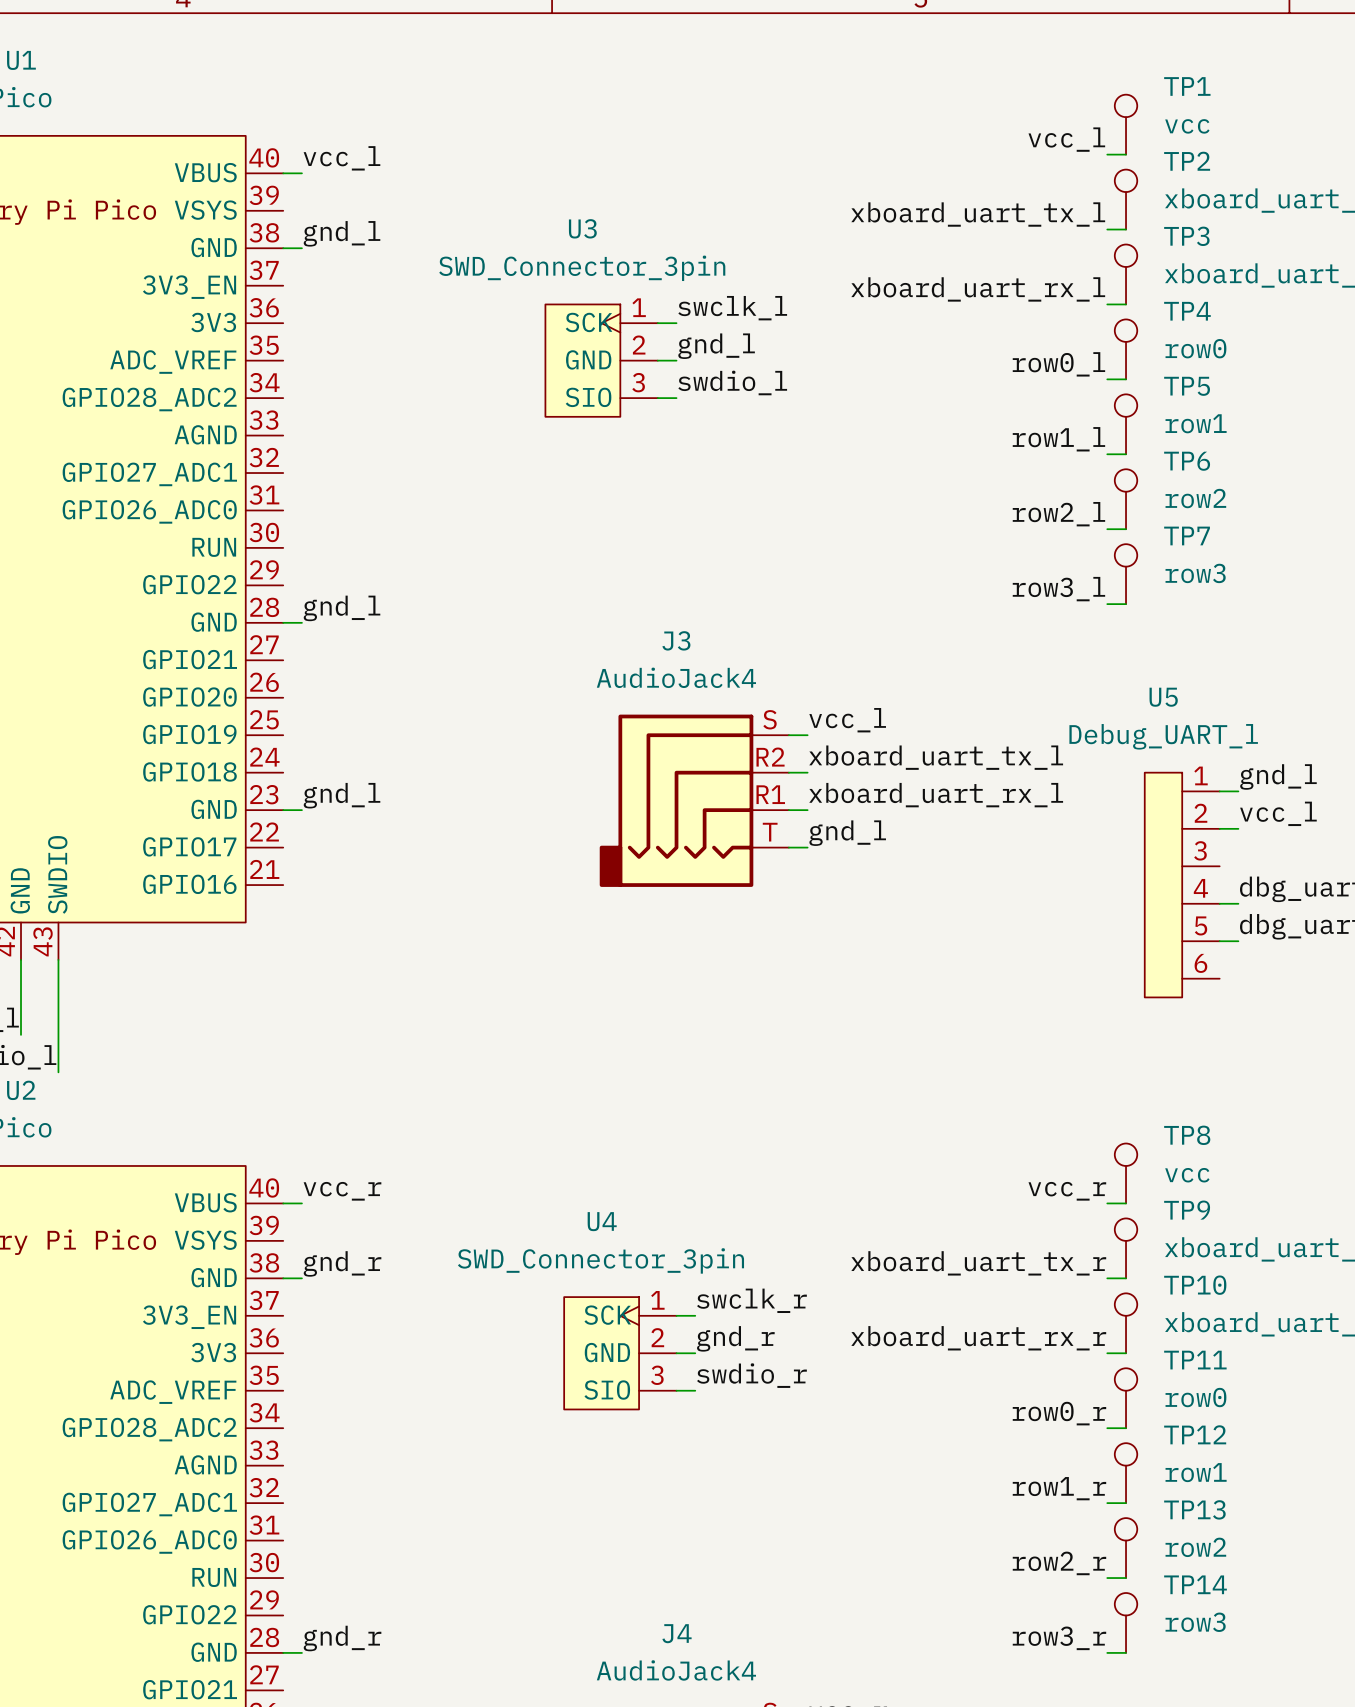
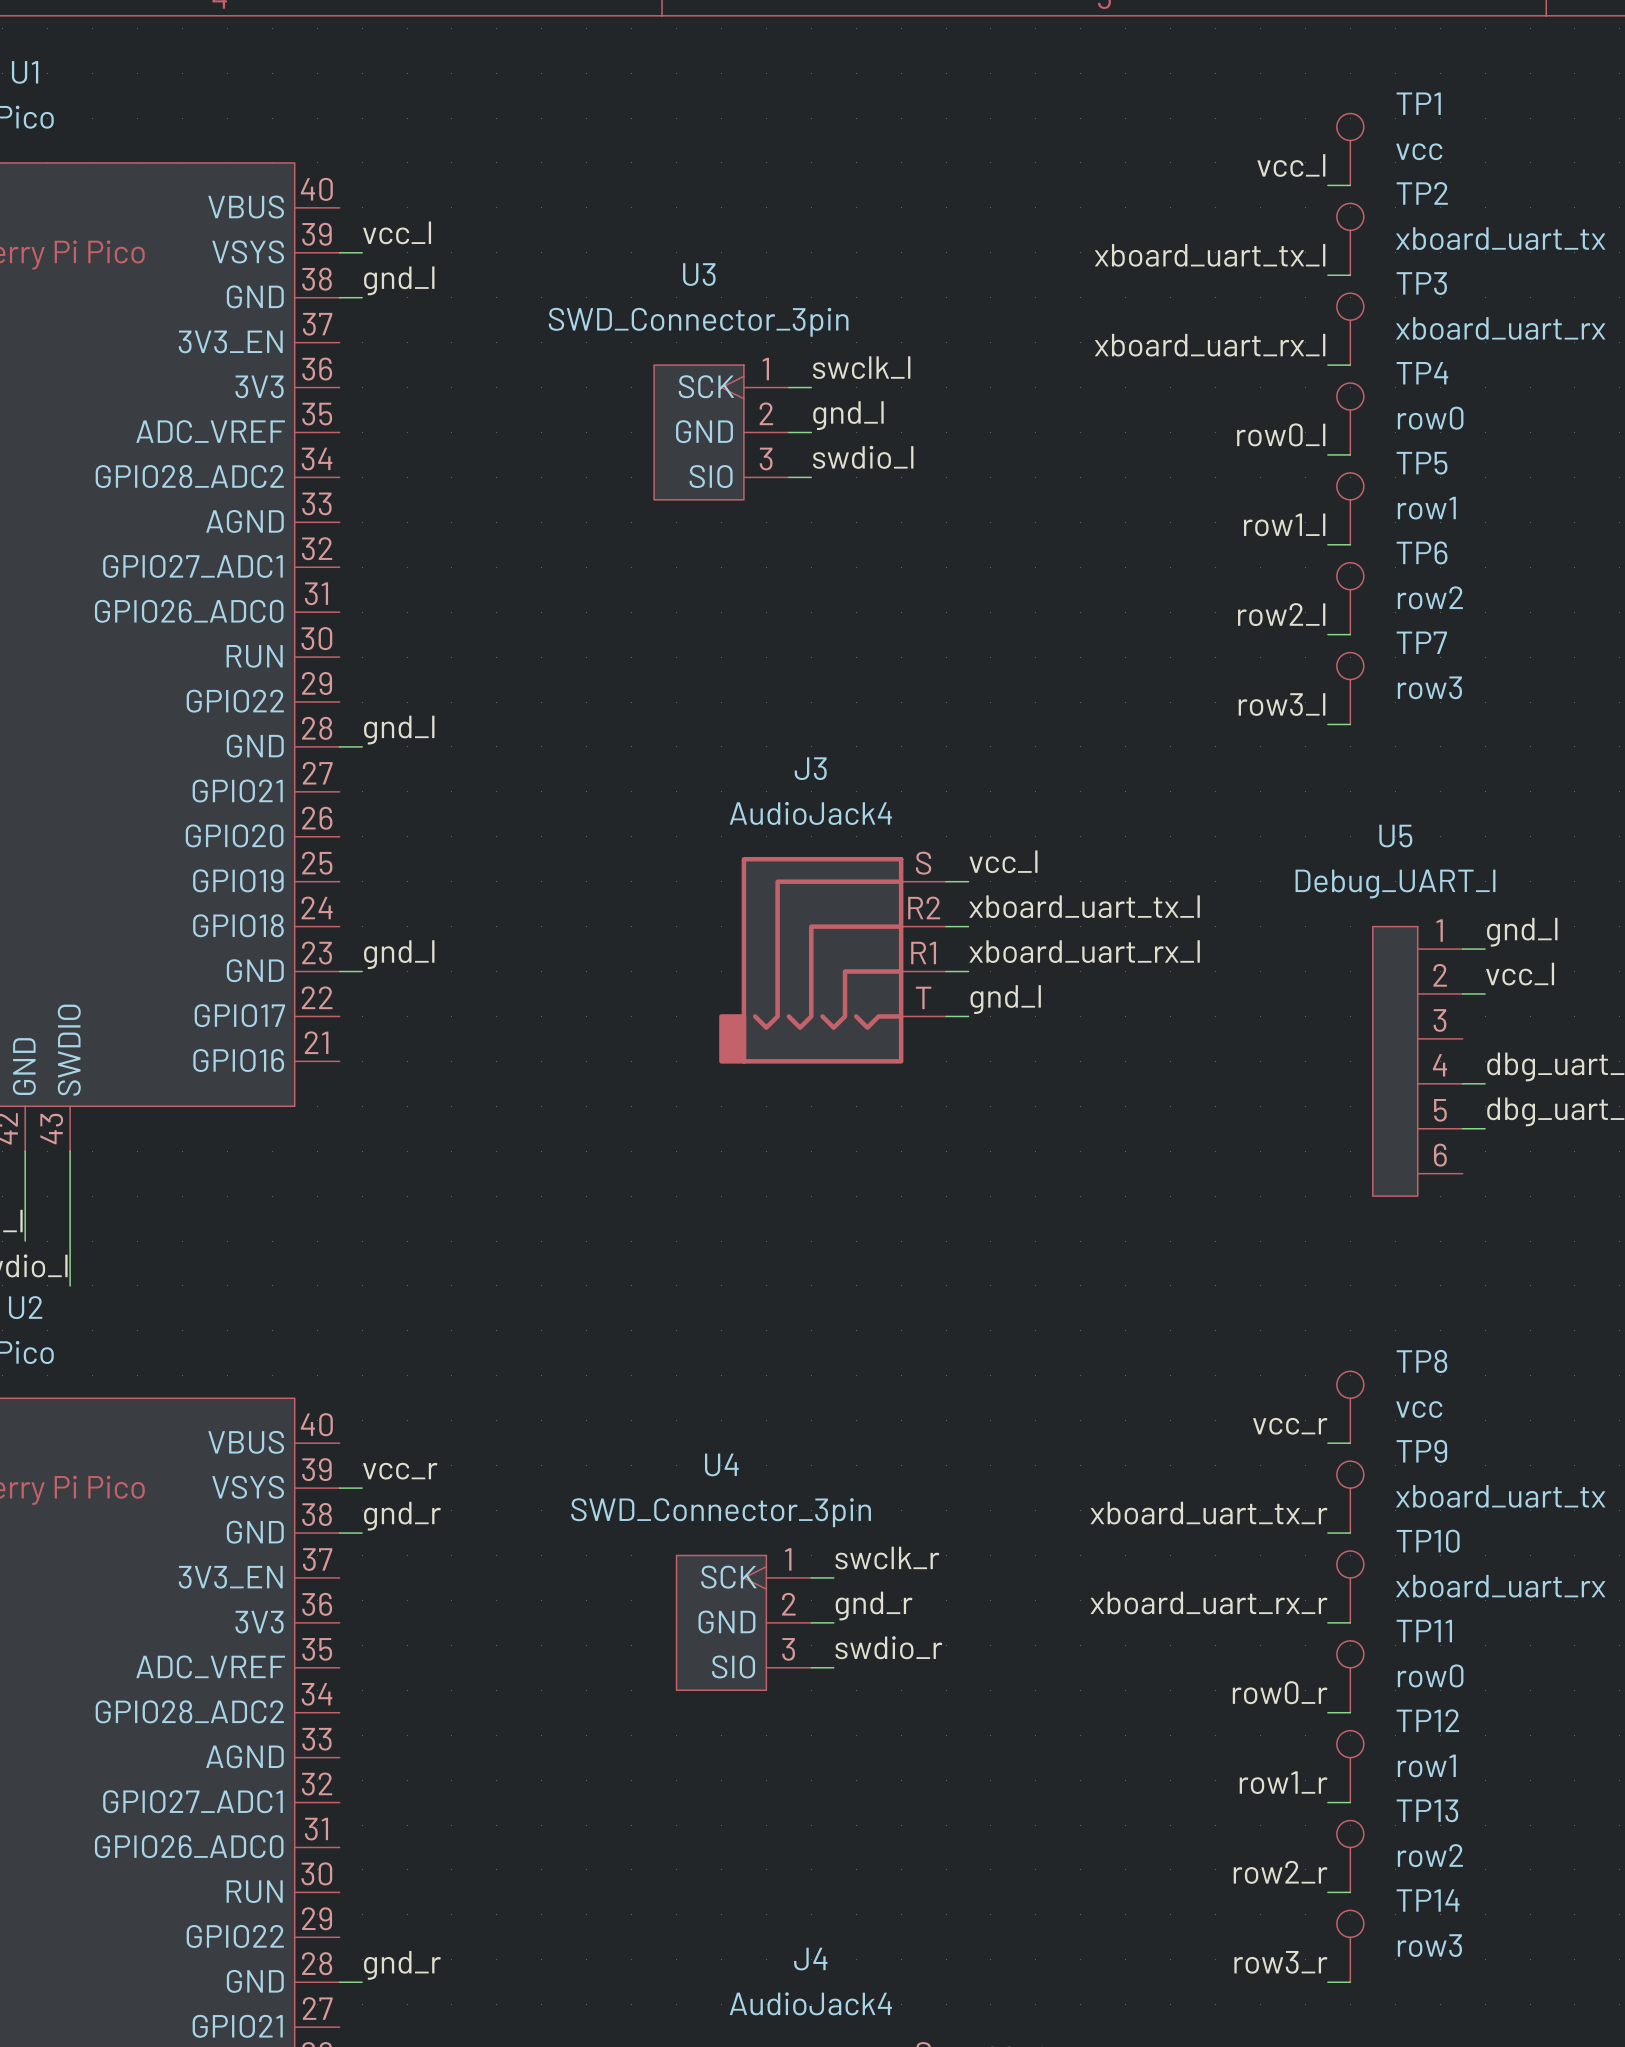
label position: vcc_l (341, 158) -> vcc_l (397, 232)
wire: (283, 173) (301, 173) -> (339, 252) (362, 252)
label position: vcc_r (342, 1191) -> vcc_r (400, 1471)
wire: (283, 1203) (301, 1203) -> (339, 1488) (362, 1488)

